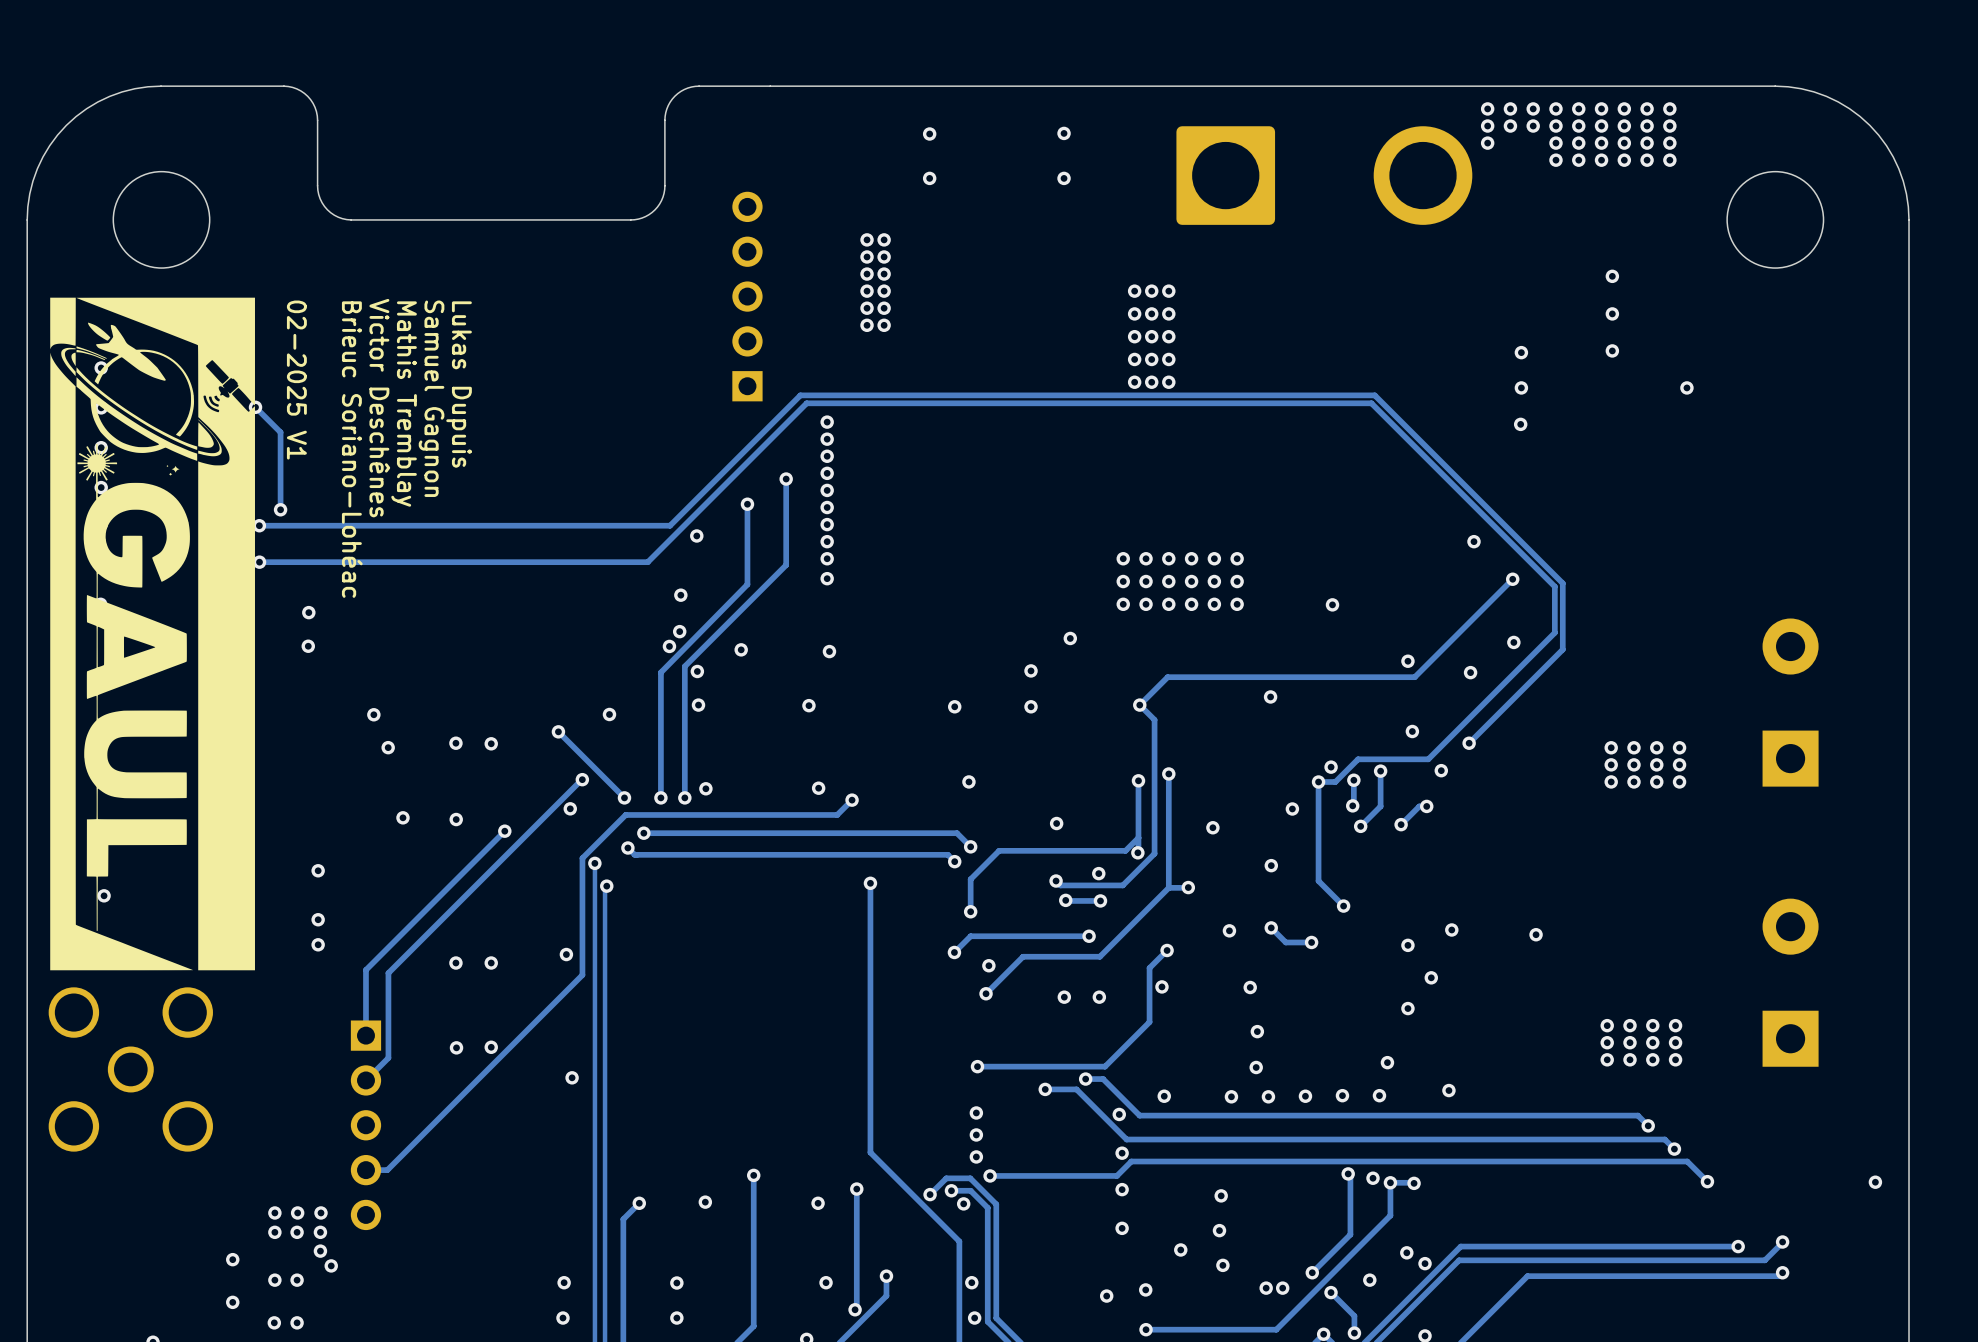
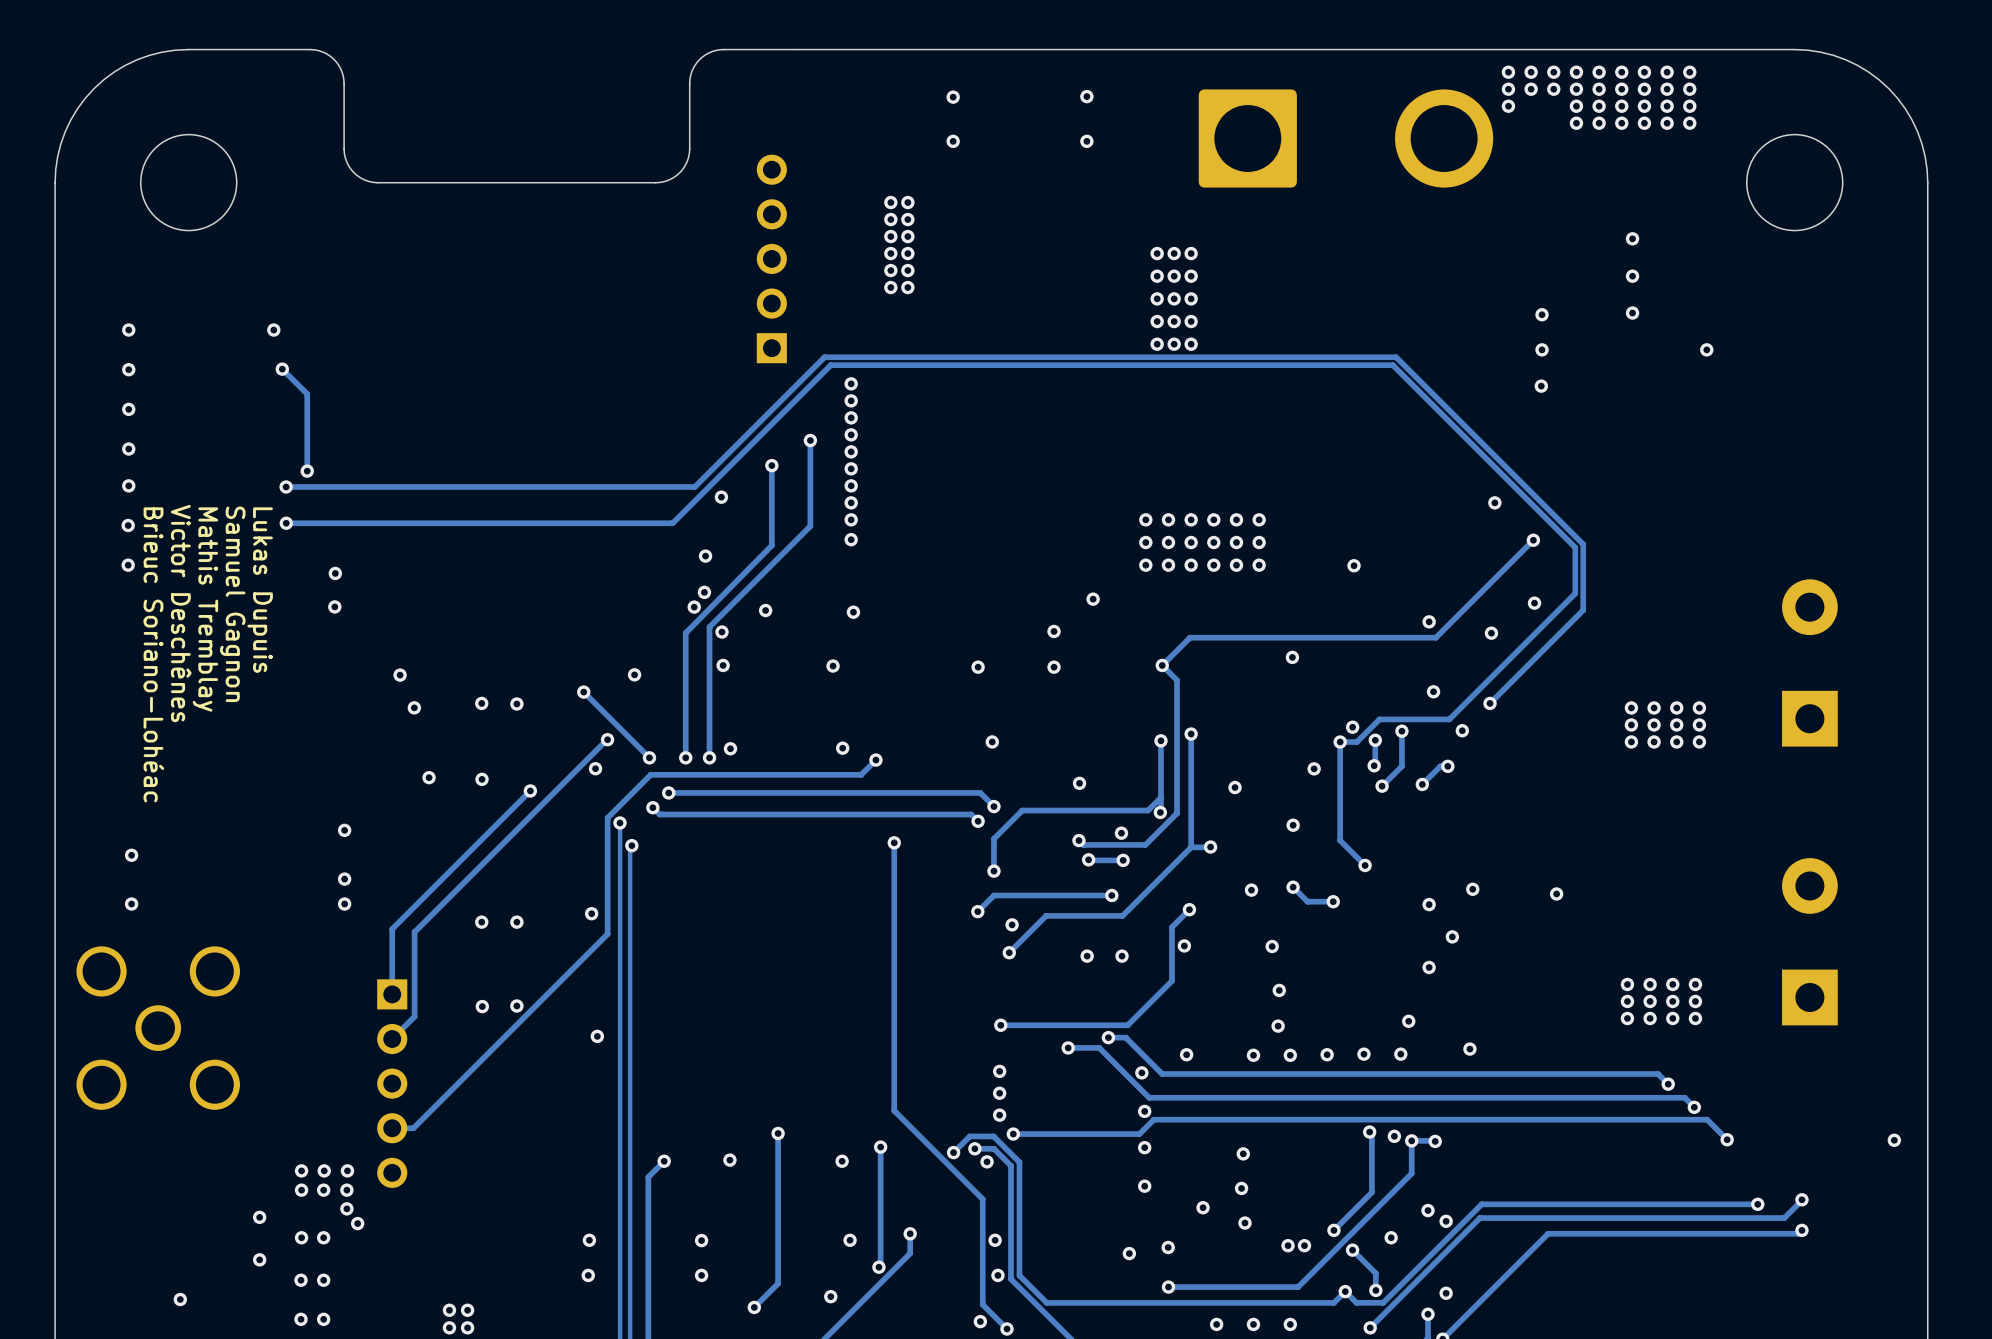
drawing: [50, 297, 255, 971] -> none
text: 02-2025 V1 (296, 380) -> none
text position: Lukas Dupuis (459, 384) -> Lukas Dupuis (260, 590)
text position: Samuel Gagnon (431, 398) -> Samuel Gagnon (232, 604)
text position: Mathis Tremblay (404, 404) -> Mathis Tremblay (205, 609)
text position: Victor Deschênes (379, 408) -> Victor Deschênes (181, 613)
text position: Brieuc Soriano-Lohéac (352, 449) -> Brieuc Soriano-Lohéac (153, 654)

